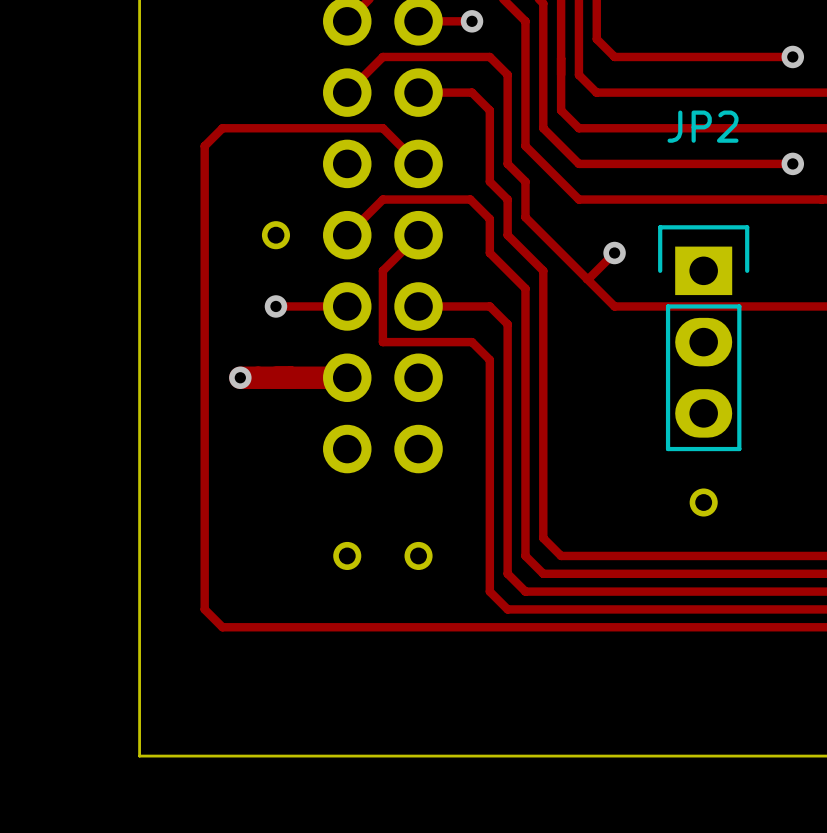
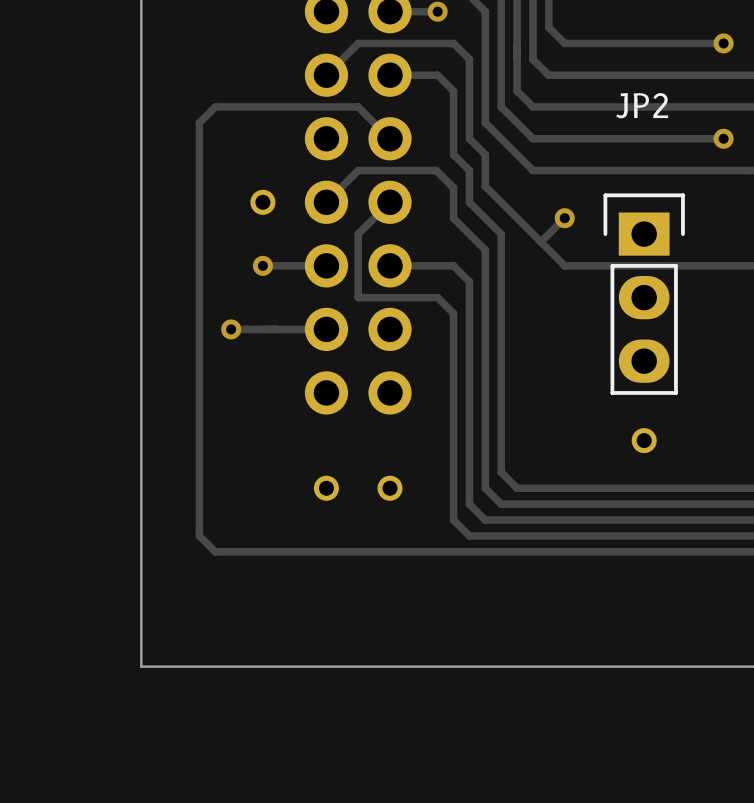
track width: thick (240, 377) (347, 377) -> thin (231, 329) (326, 329)

